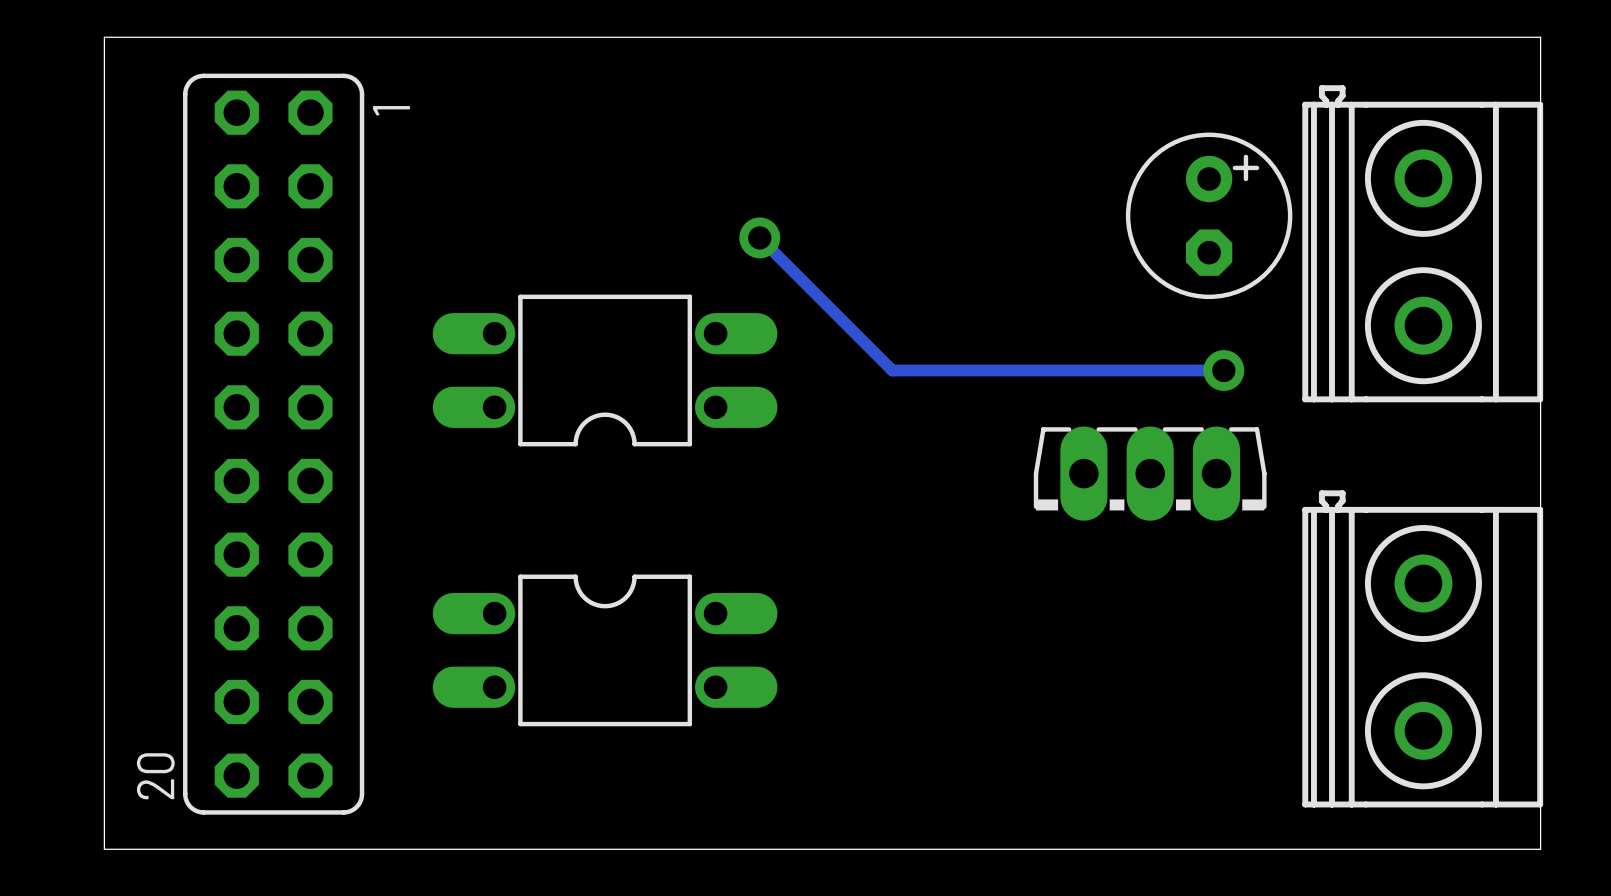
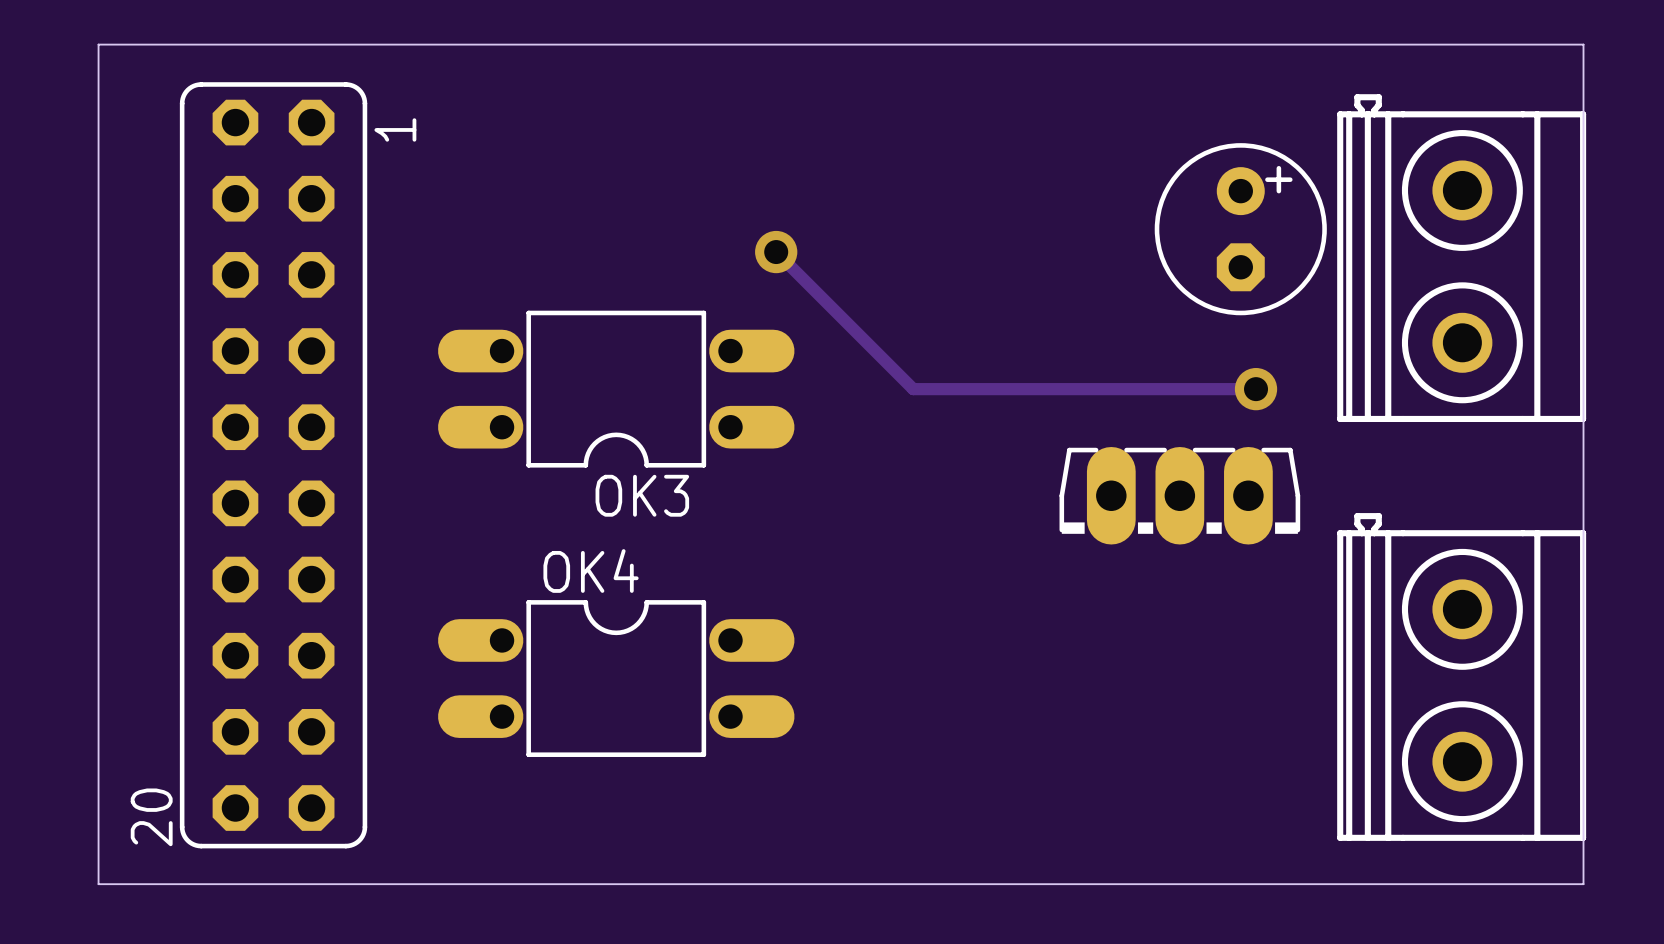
OK3 name: none -> OK3 (642, 495)
OK4 name: none -> OK4 (591, 571)

